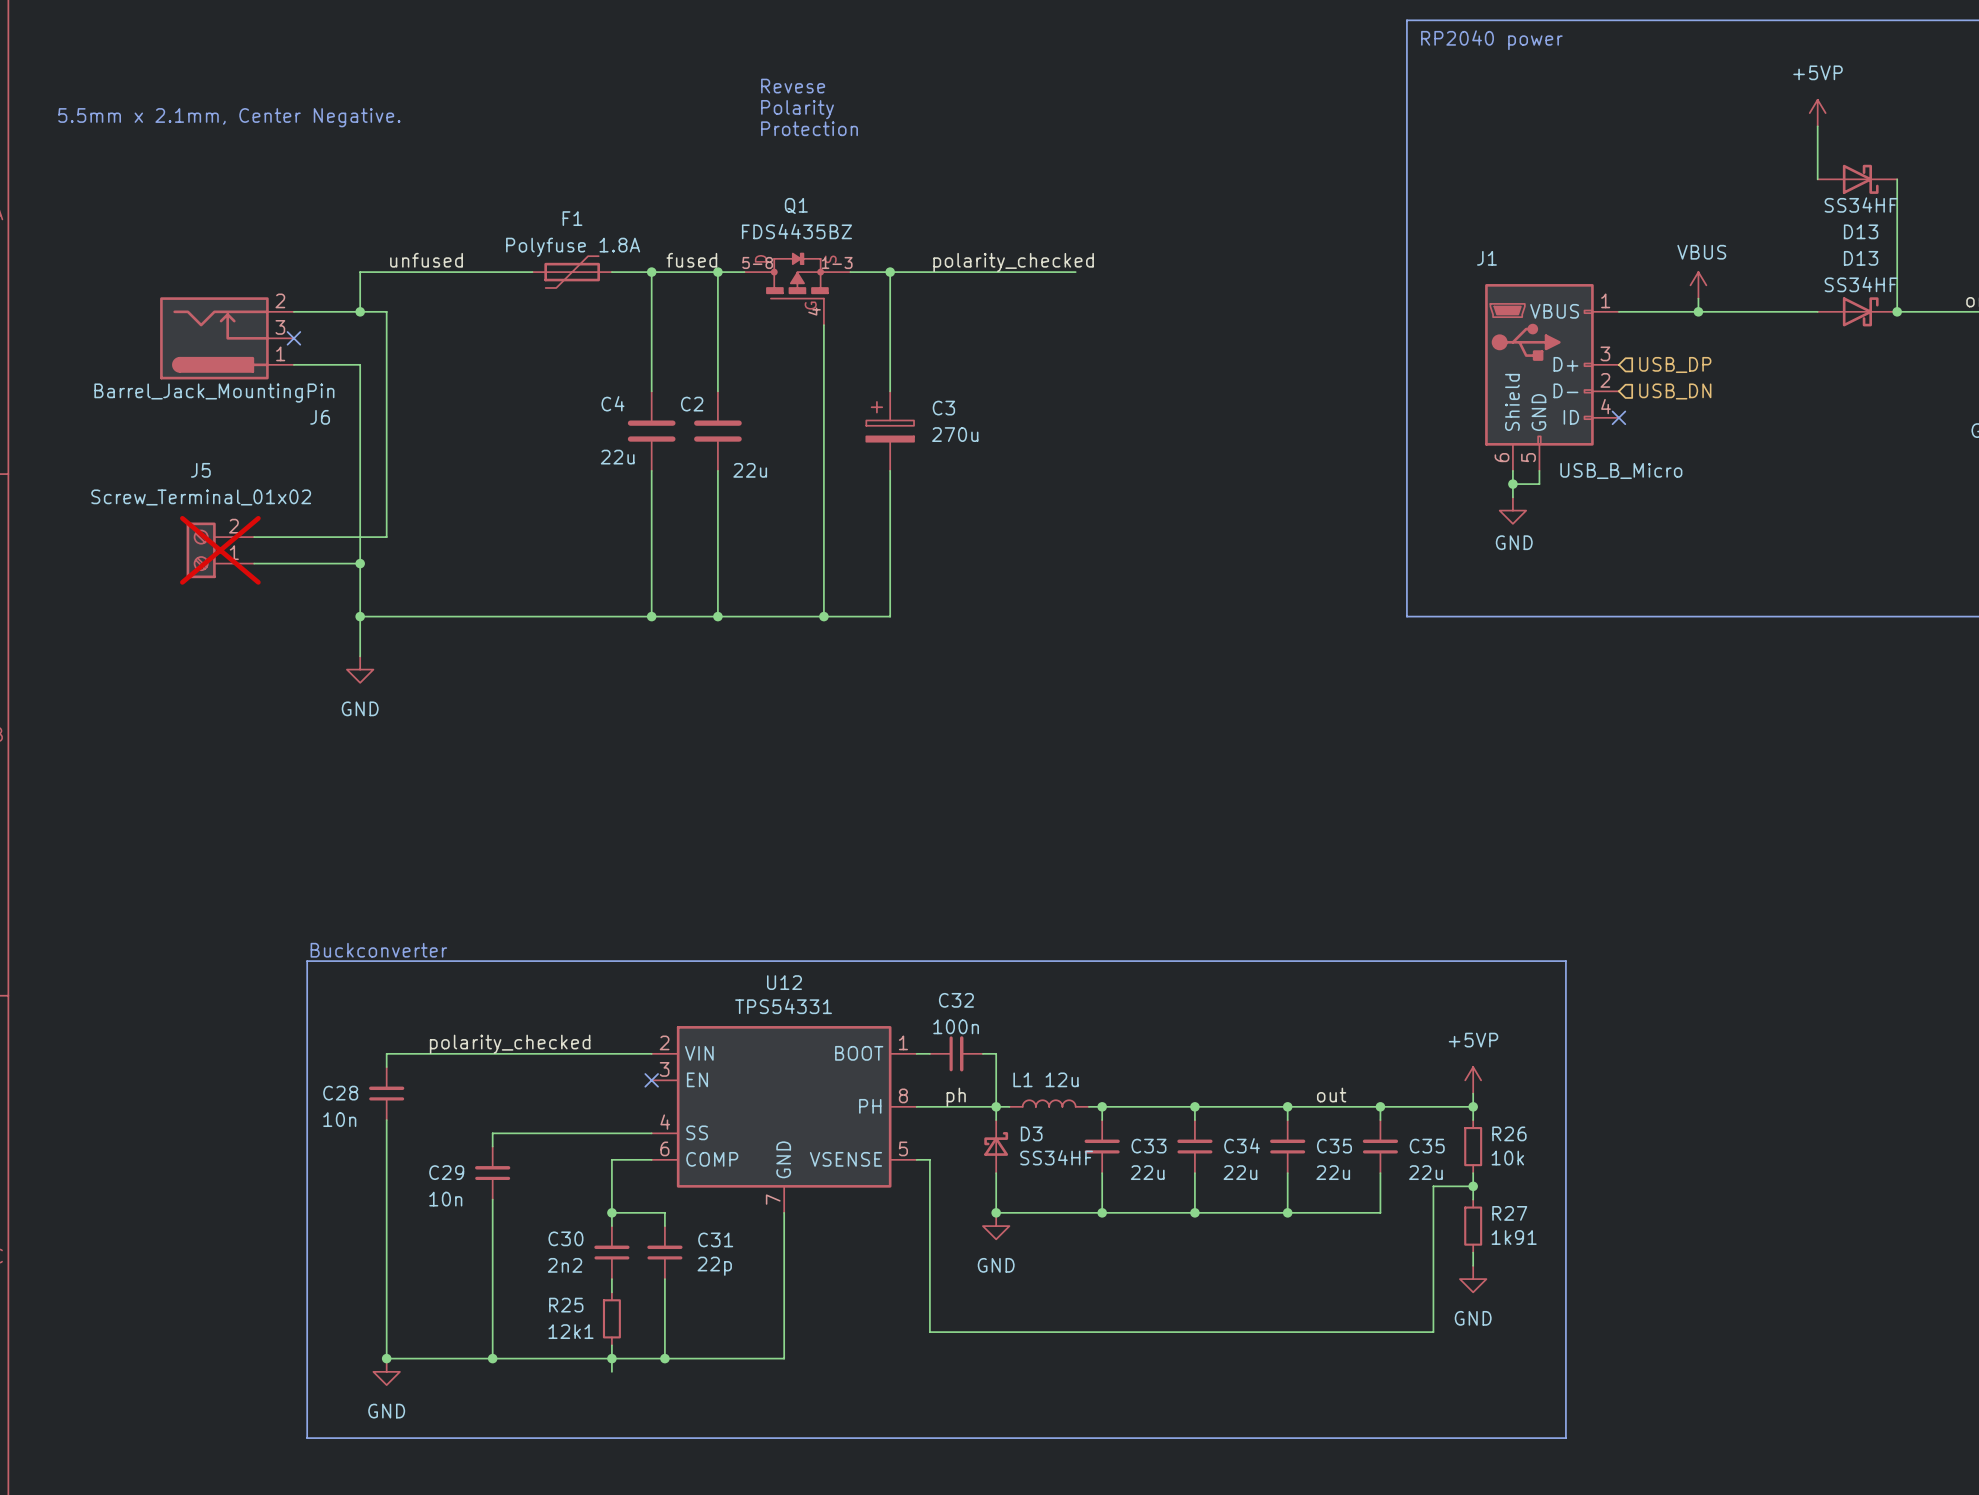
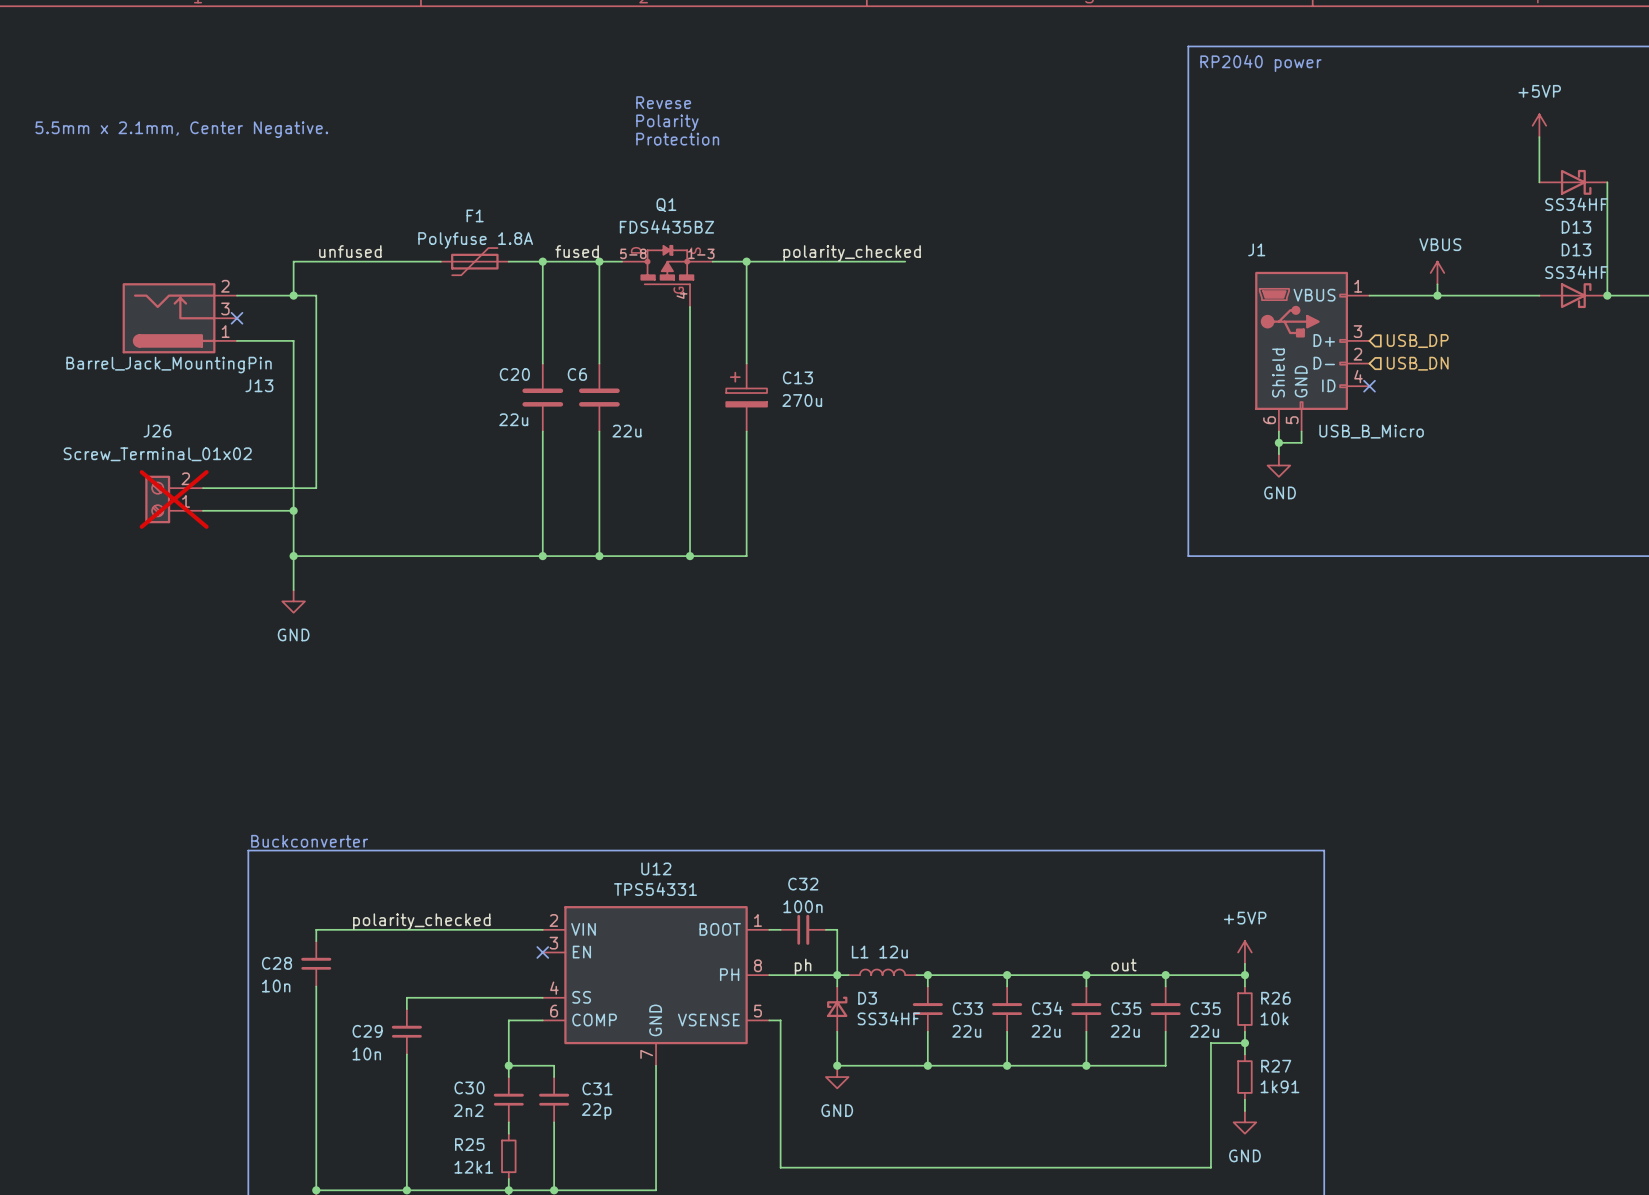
C4 name: C4 (612, 403) -> C20 (514, 374)
C2 name: C2 (692, 404) -> C6 (577, 374)
C3 name: C3 (943, 408) -> C13 (797, 377)
J6 name: J6 (320, 417) -> J13 (259, 385)
J5 name: J5 (200, 470) -> J26 (157, 431)

